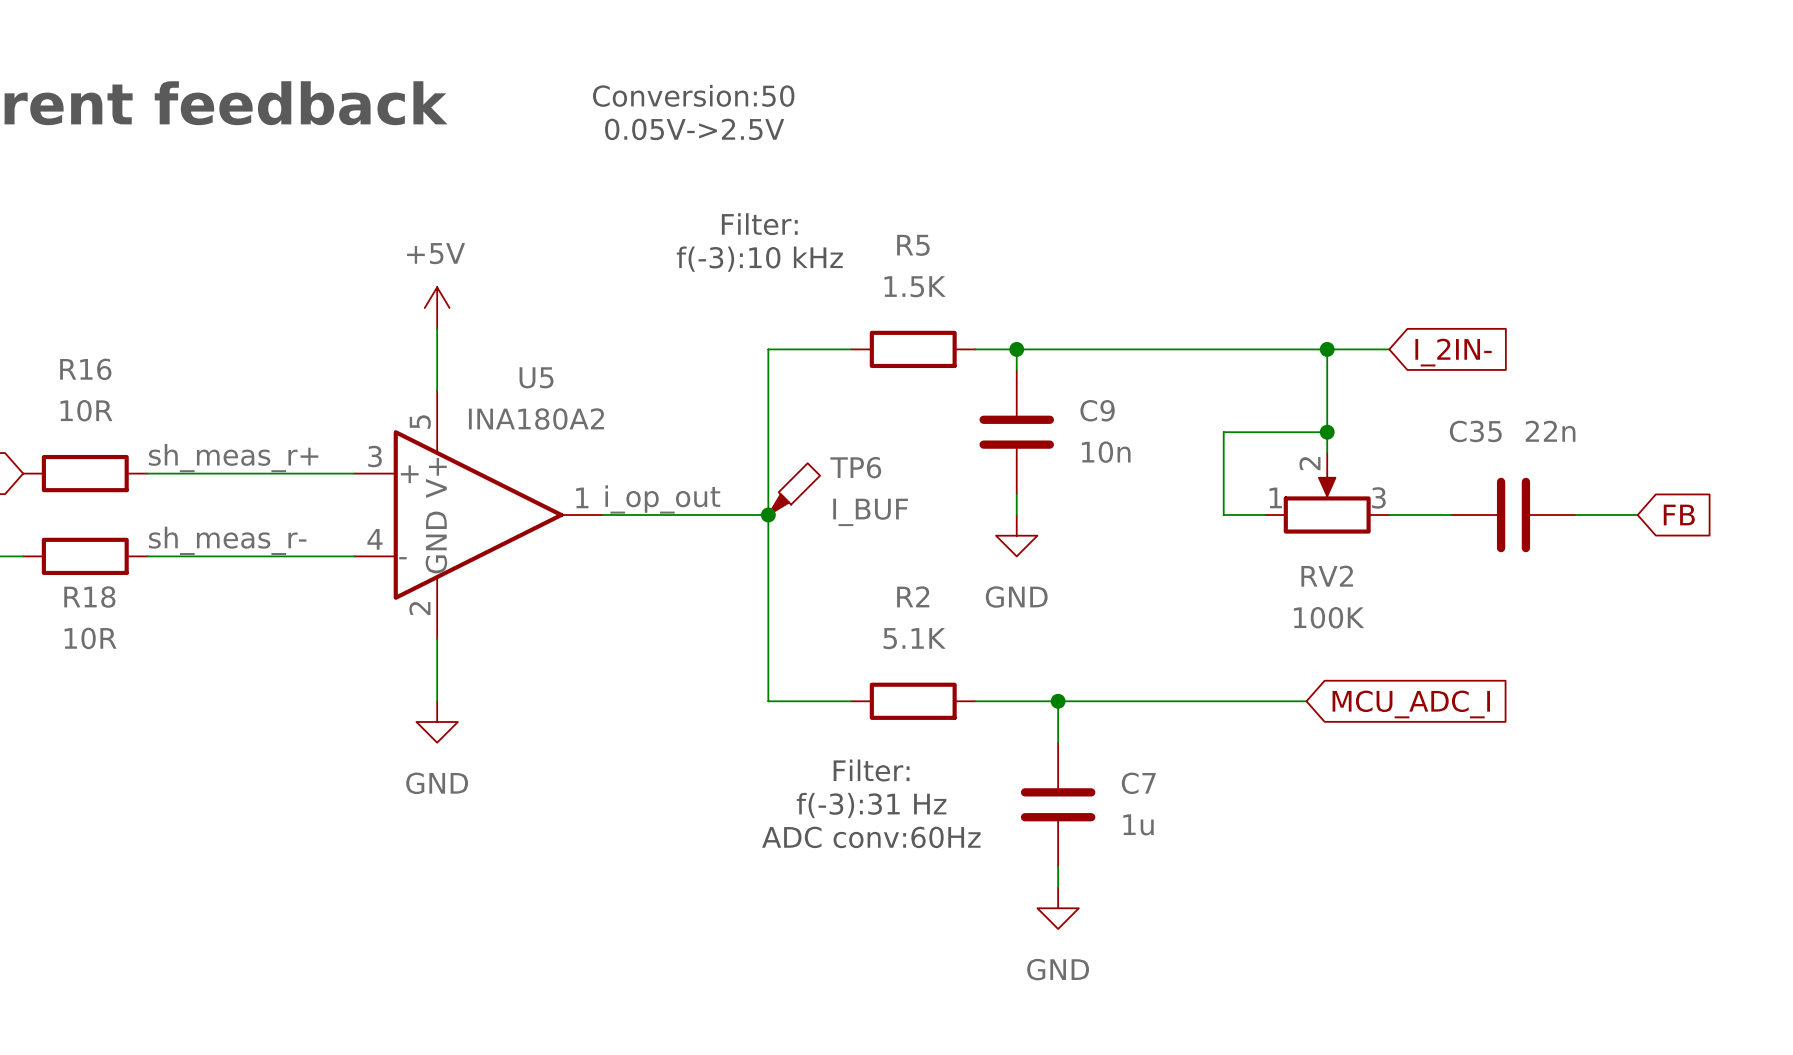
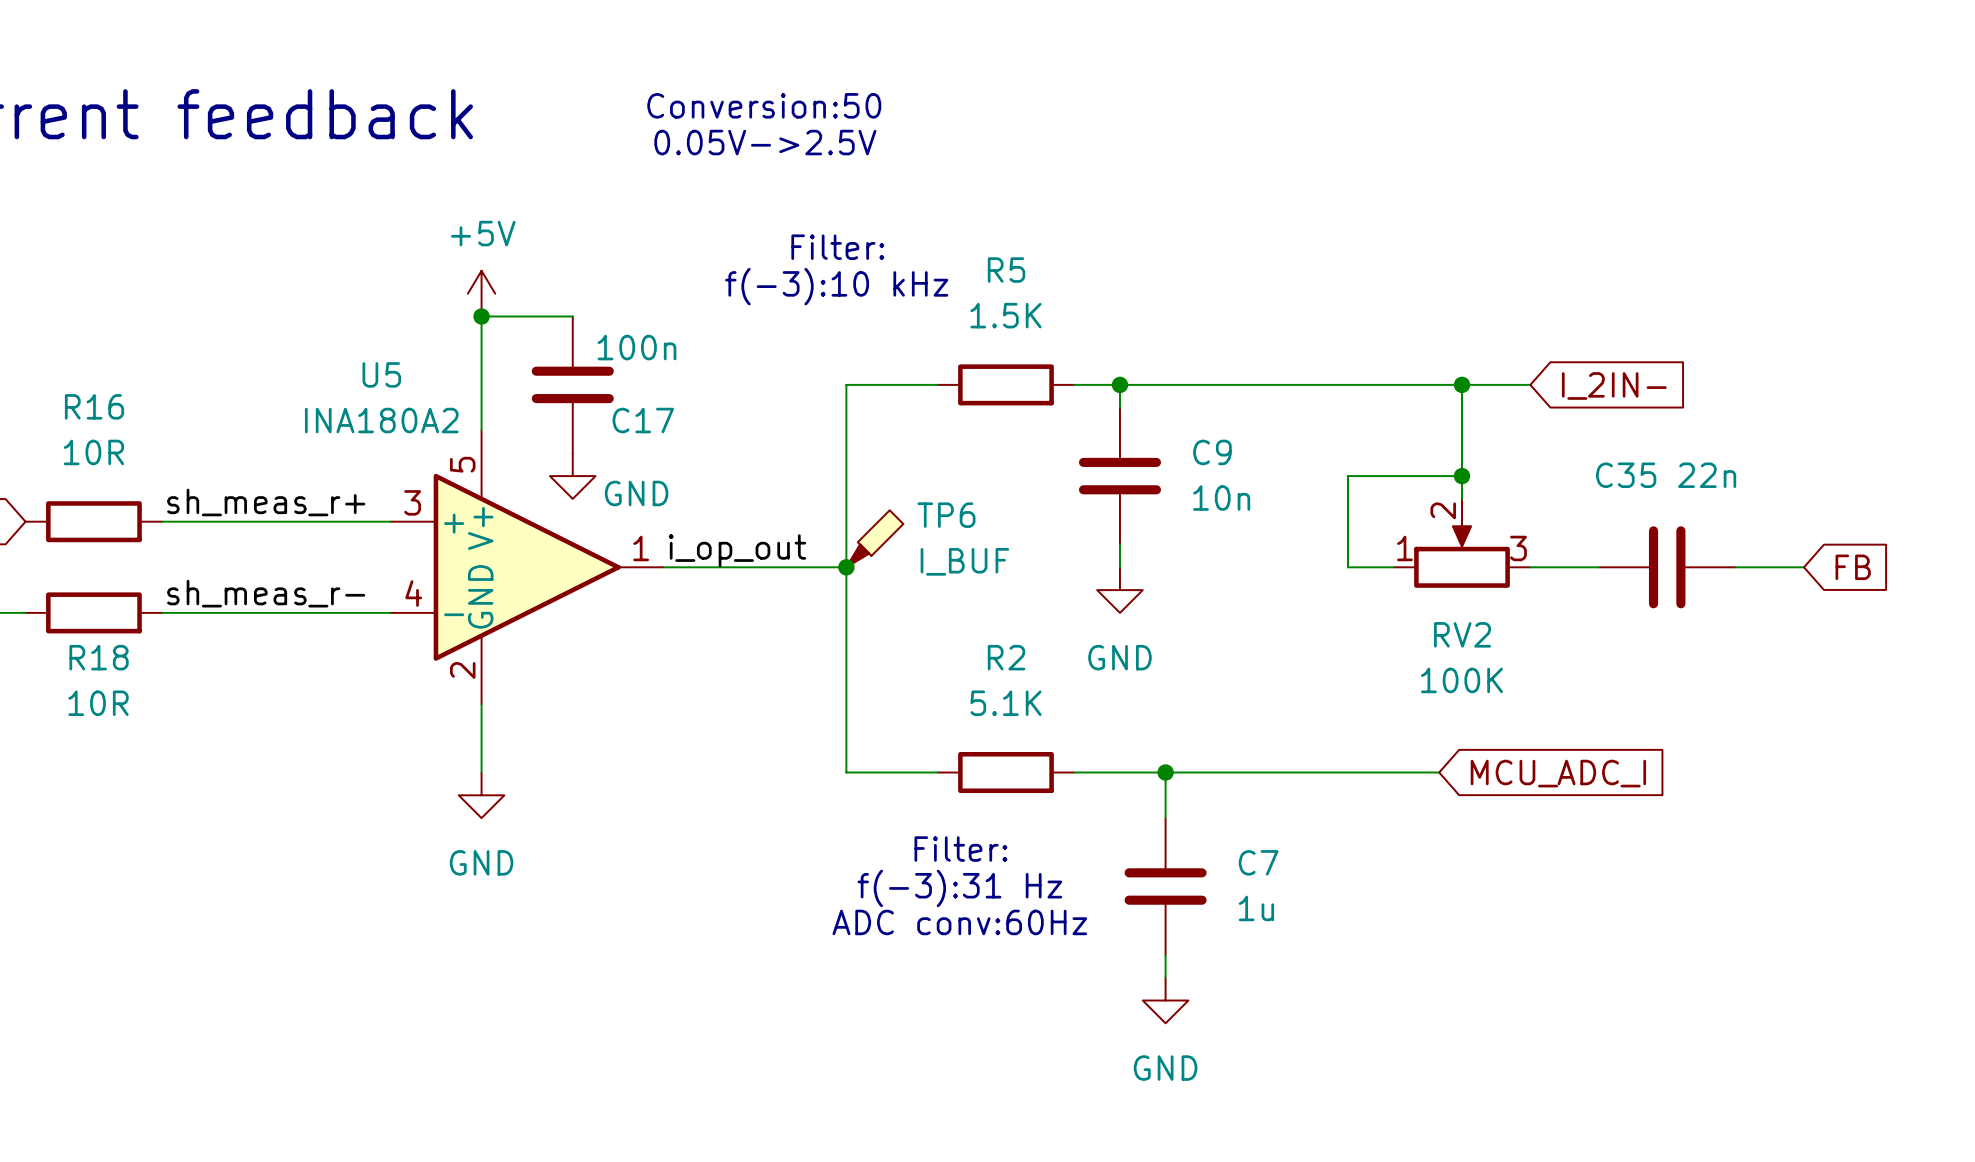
junction: none -> (481, 316)
wire: none -> (572, 316) (481, 316) (481, 362)
power symbol position: +5V (437, 308) -> +5V (481, 293)
C17: none -> 100n (572, 384)
U5 name position: U5 (536, 377) -> U5 (381, 374)
U5 value position: INA180A2 (536, 419) -> INA180A2 (381, 420)
power symbol: none -> GND (572, 476)

